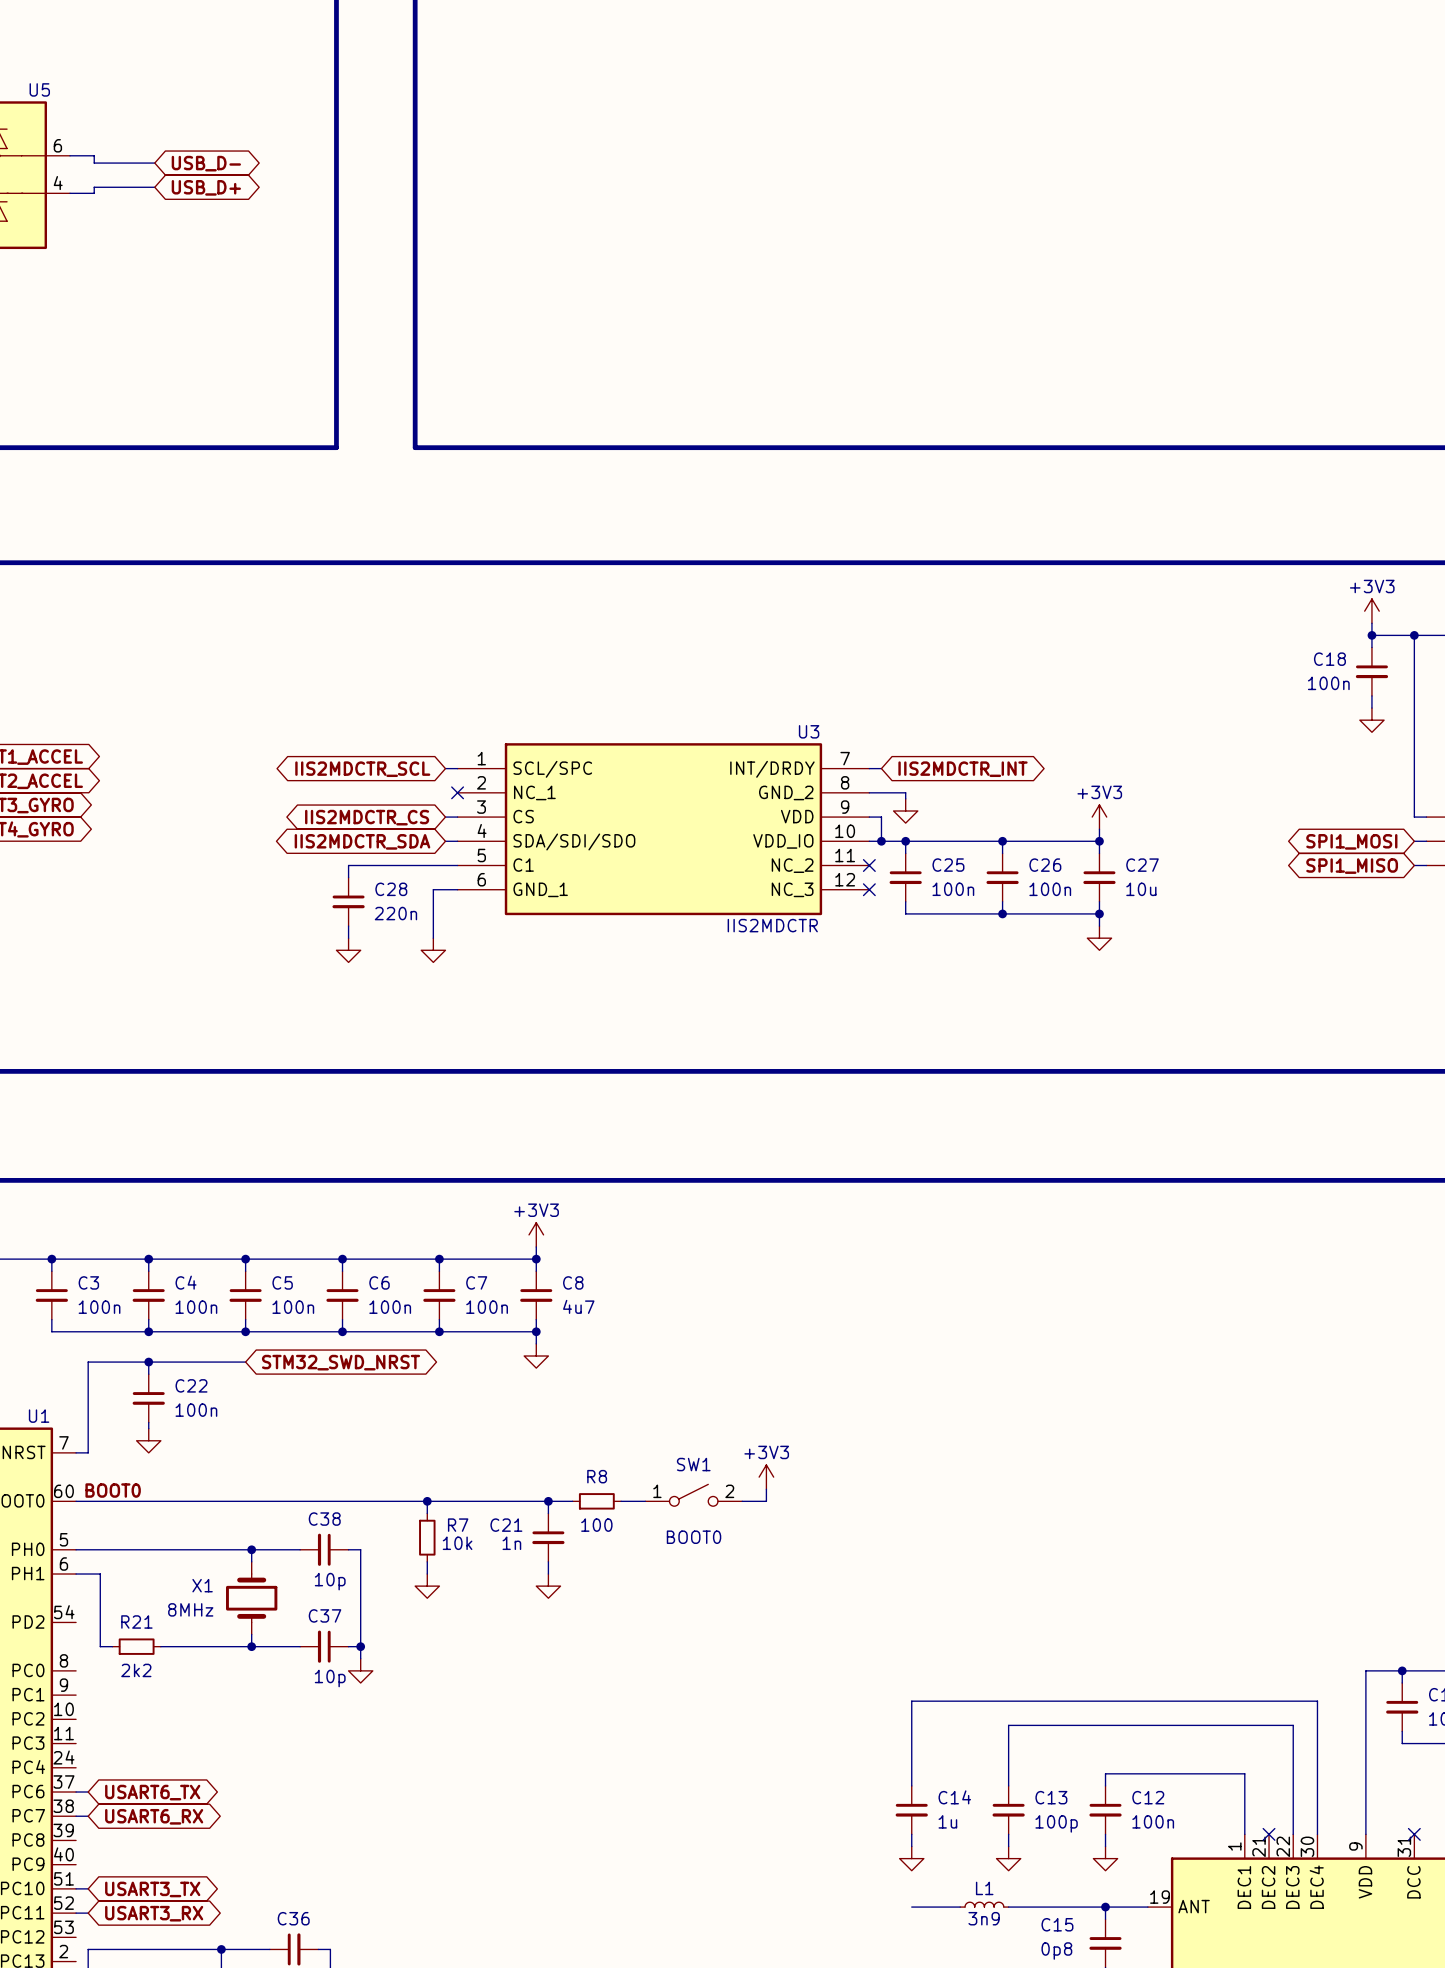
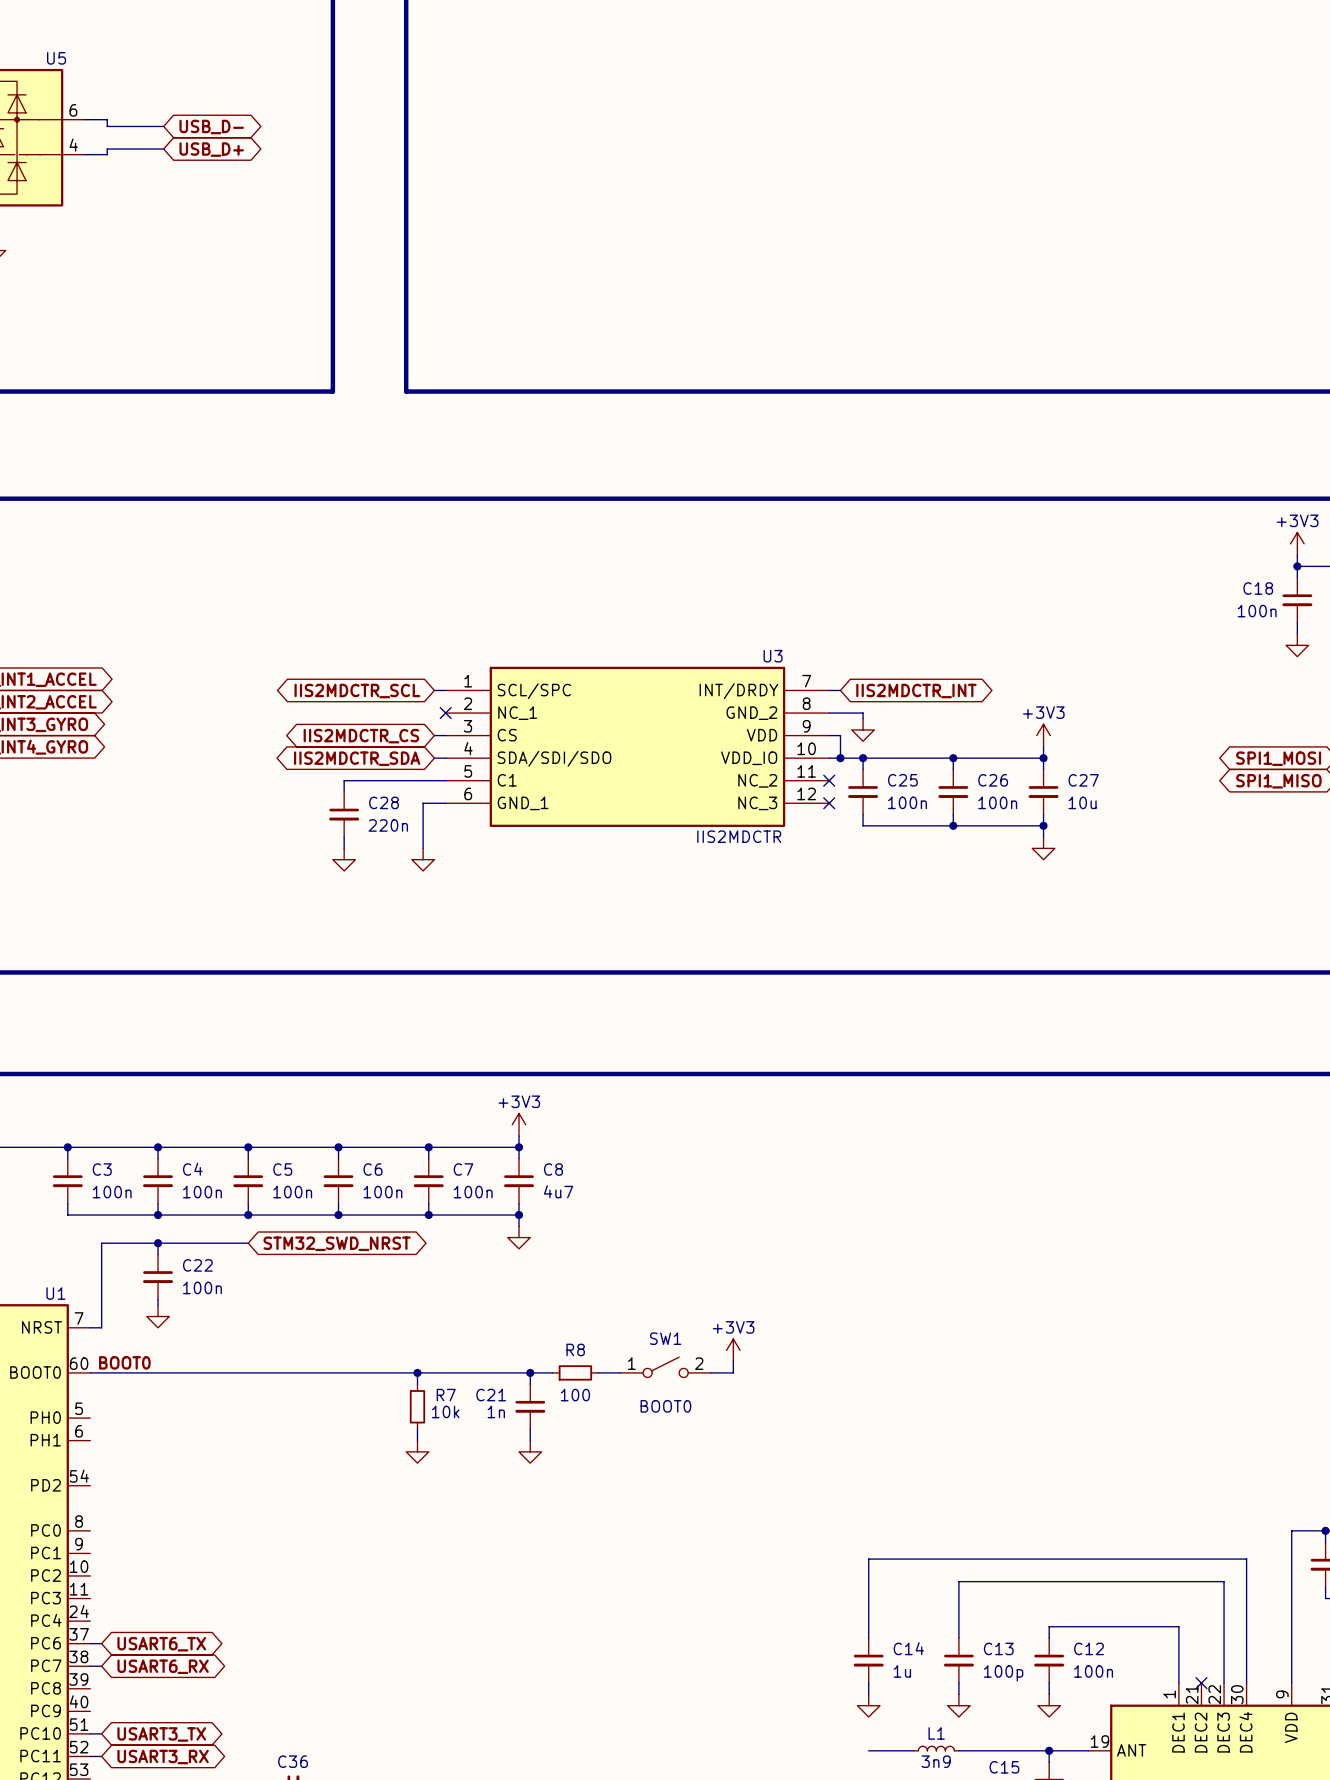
wire: (76, 1549) (300, 1549) -> none
wire: (251, 1549) (251, 1561) -> none
junction: (251, 1549) -> none
C38: 10p (324, 1549) -> none
wire: (348, 1549) (360, 1549) (360, 1658) -> none
wire: (76, 1574) (100, 1574) (100, 1646) (112, 1646) -> none
X1: 8MHz (251, 1598) -> none
wire: (251, 1634) (251, 1646) -> none
R21: 2k2 (136, 1646) -> none
wire: (160, 1646) (300, 1646) -> none
junction: (251, 1646) -> none
C37: 10p (324, 1646) -> none
wire: (348, 1646) (360, 1646) -> none
junction: (360, 1646) -> none
power symbol: (360, 1670) -> none

